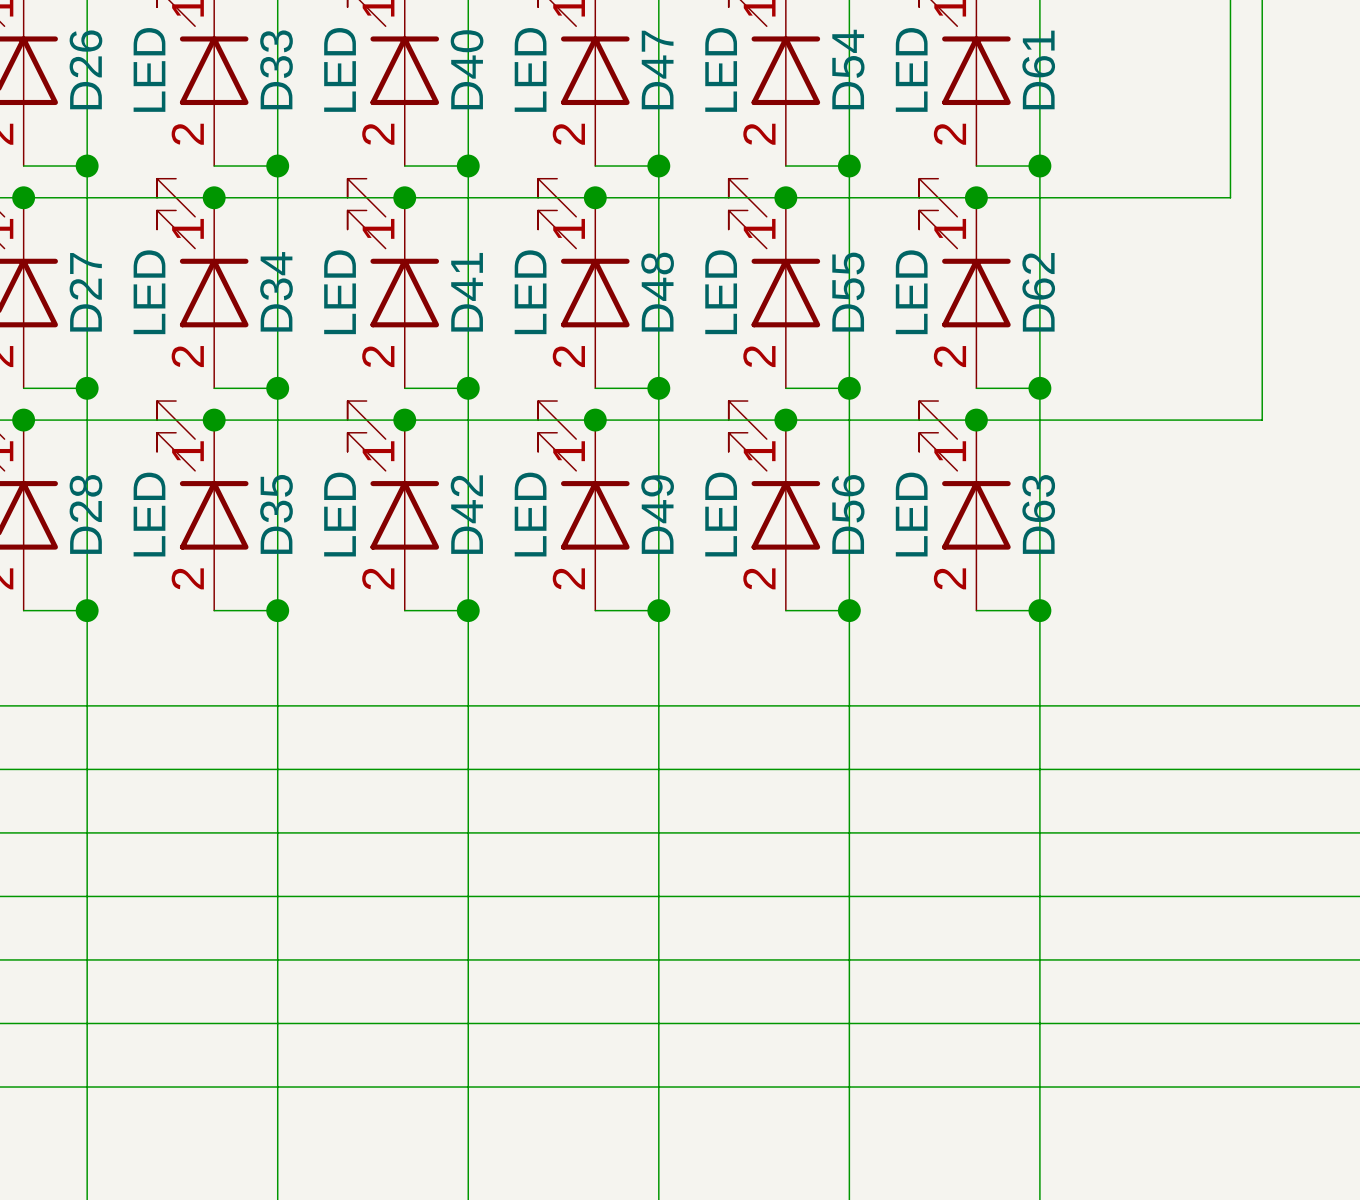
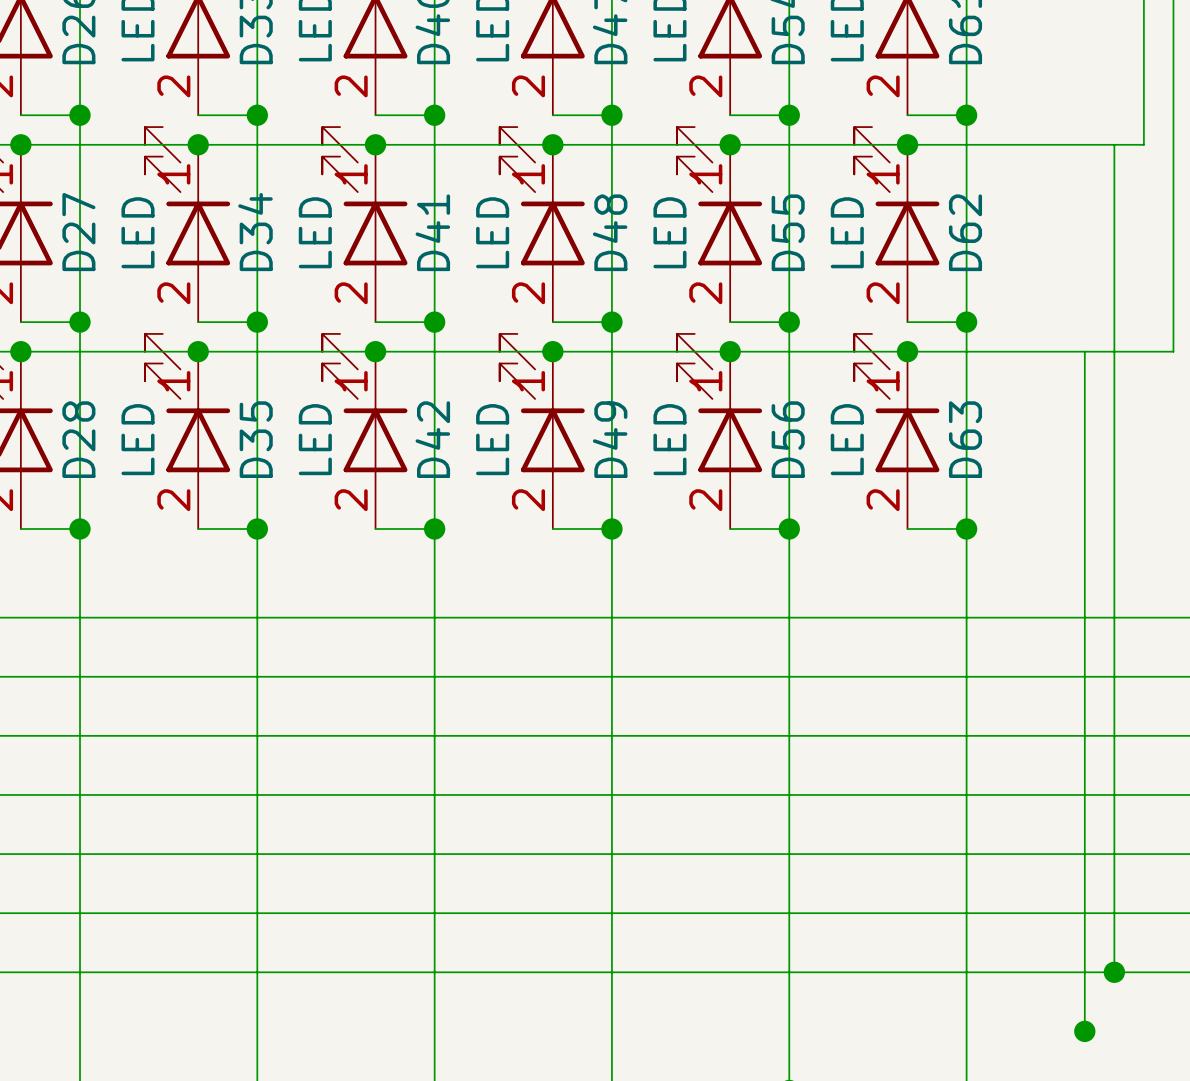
wire: none -> (1114, 144) (1114, 972)
wire: none -> (1084, 351) (1084, 1031)
junction: none -> (1114, 972)
junction: none -> (1084, 1031)

